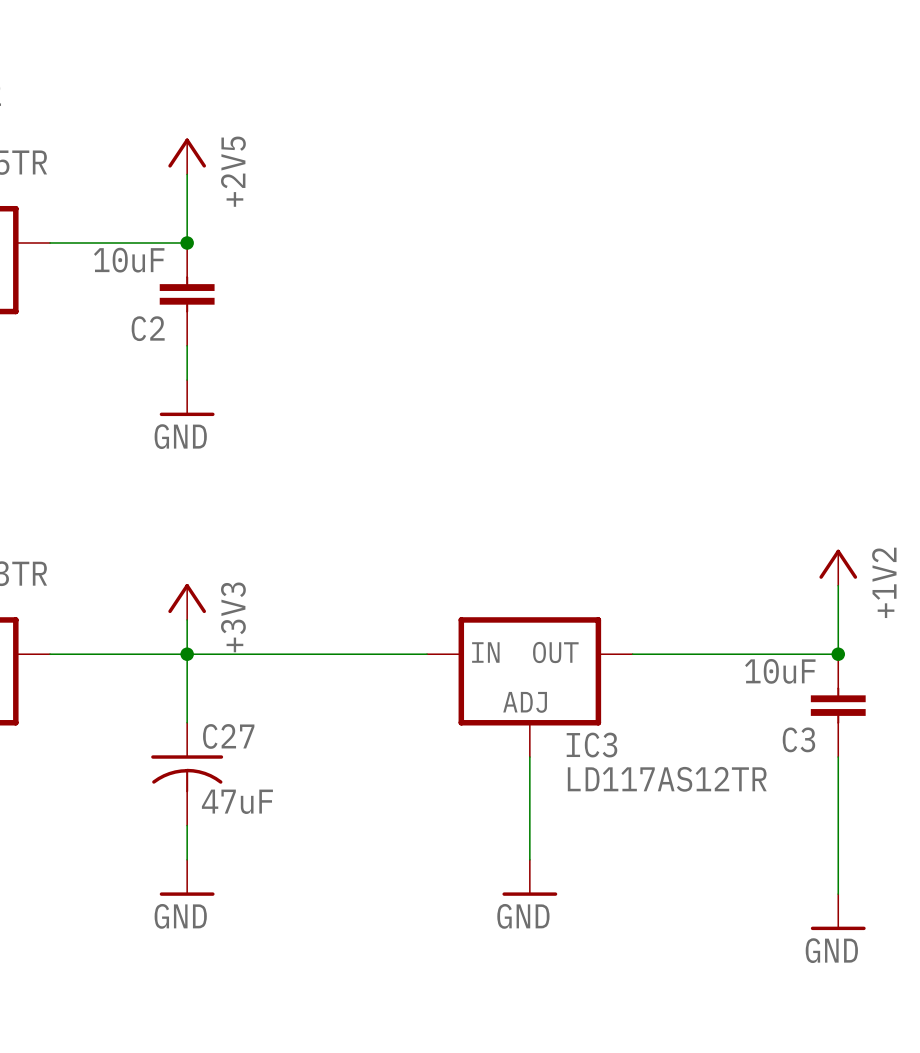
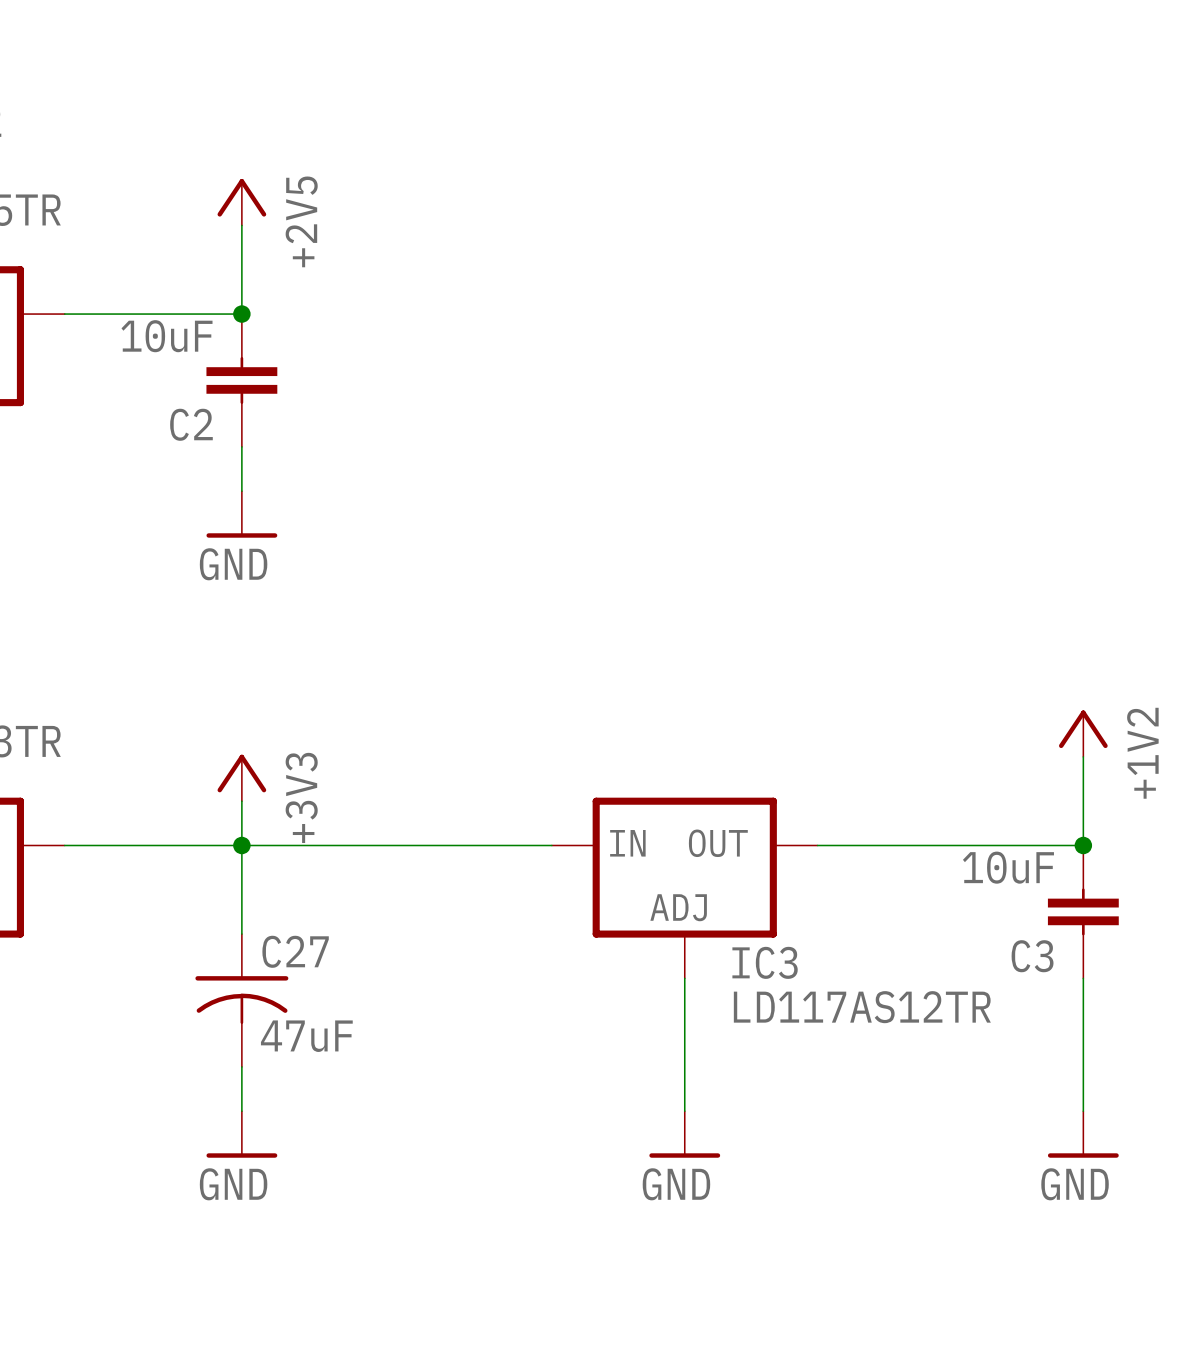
power symbol position: GND (838, 912) -> GND (1083, 1134)

